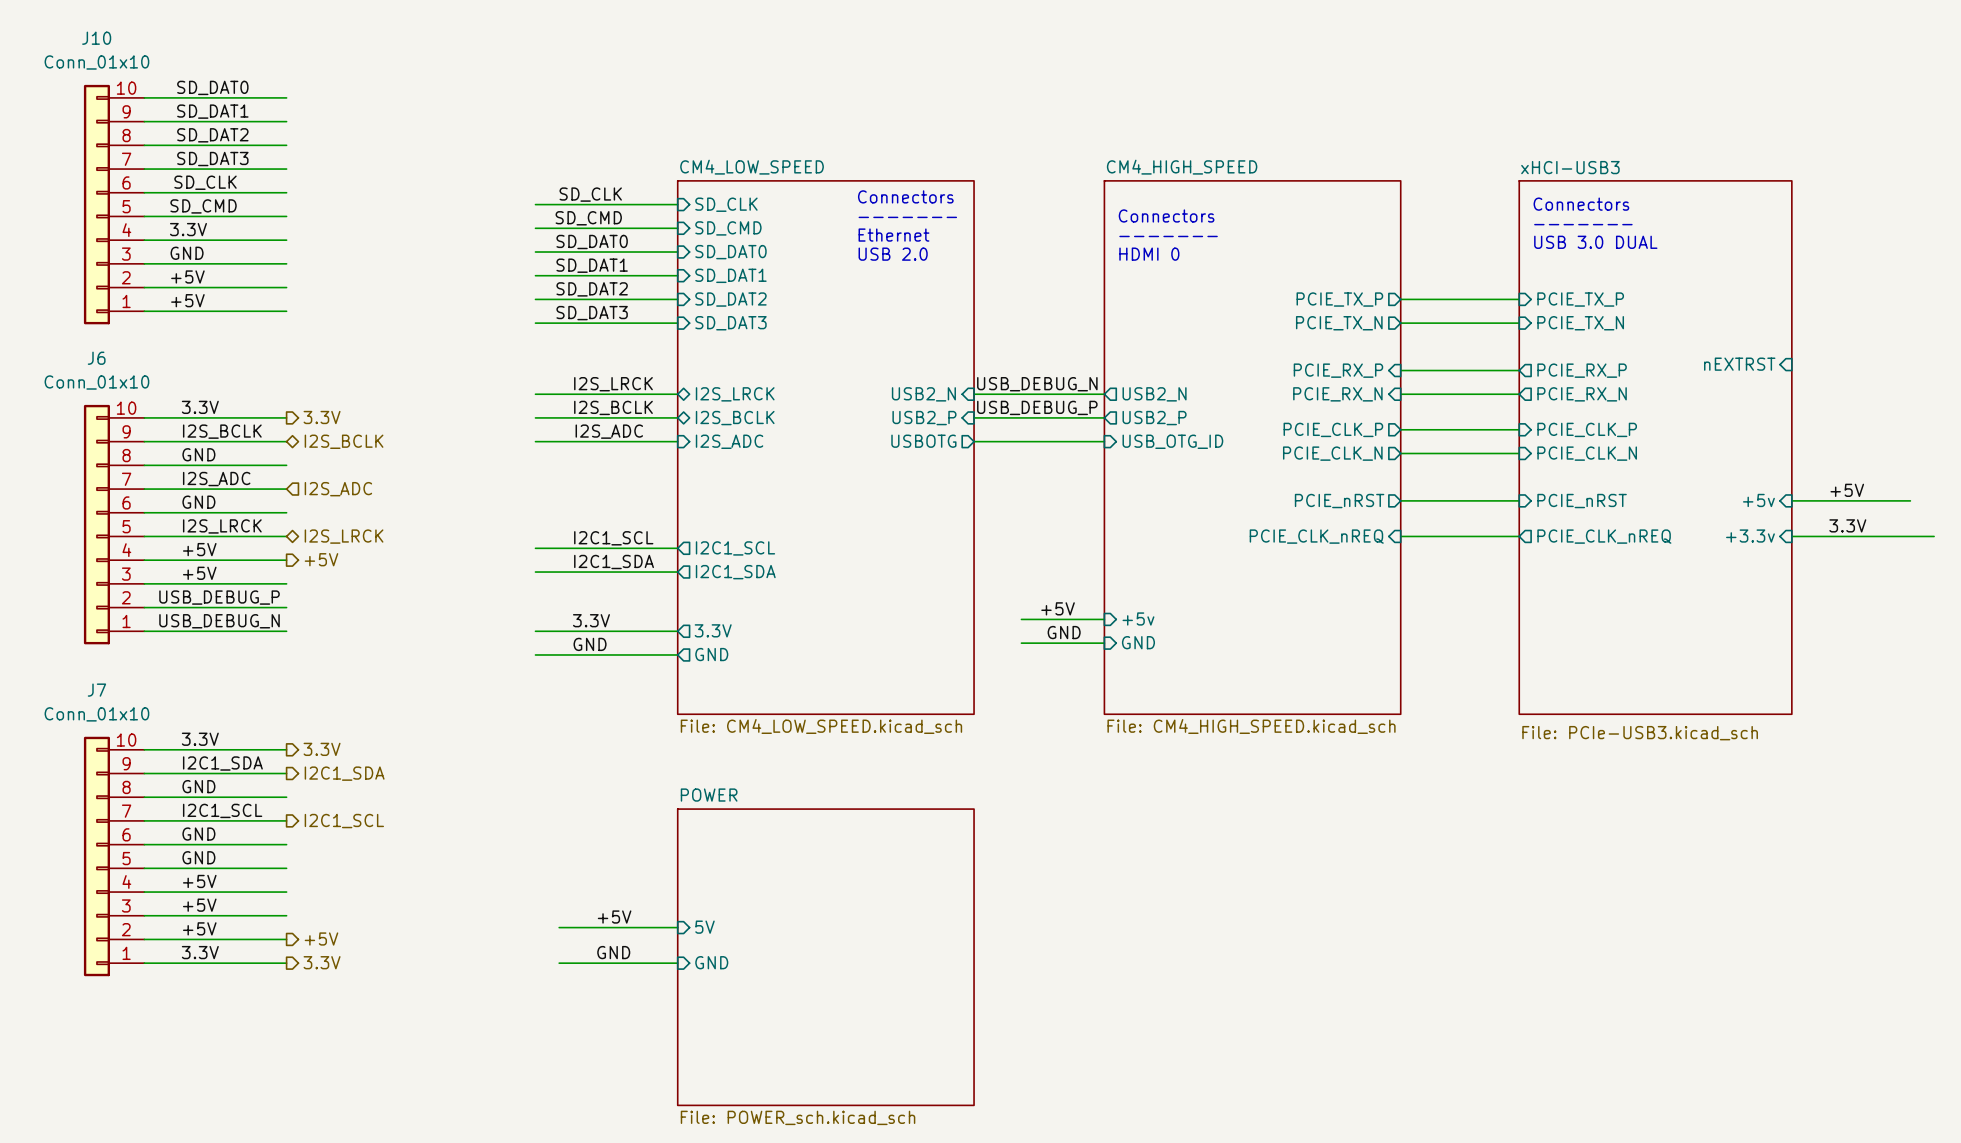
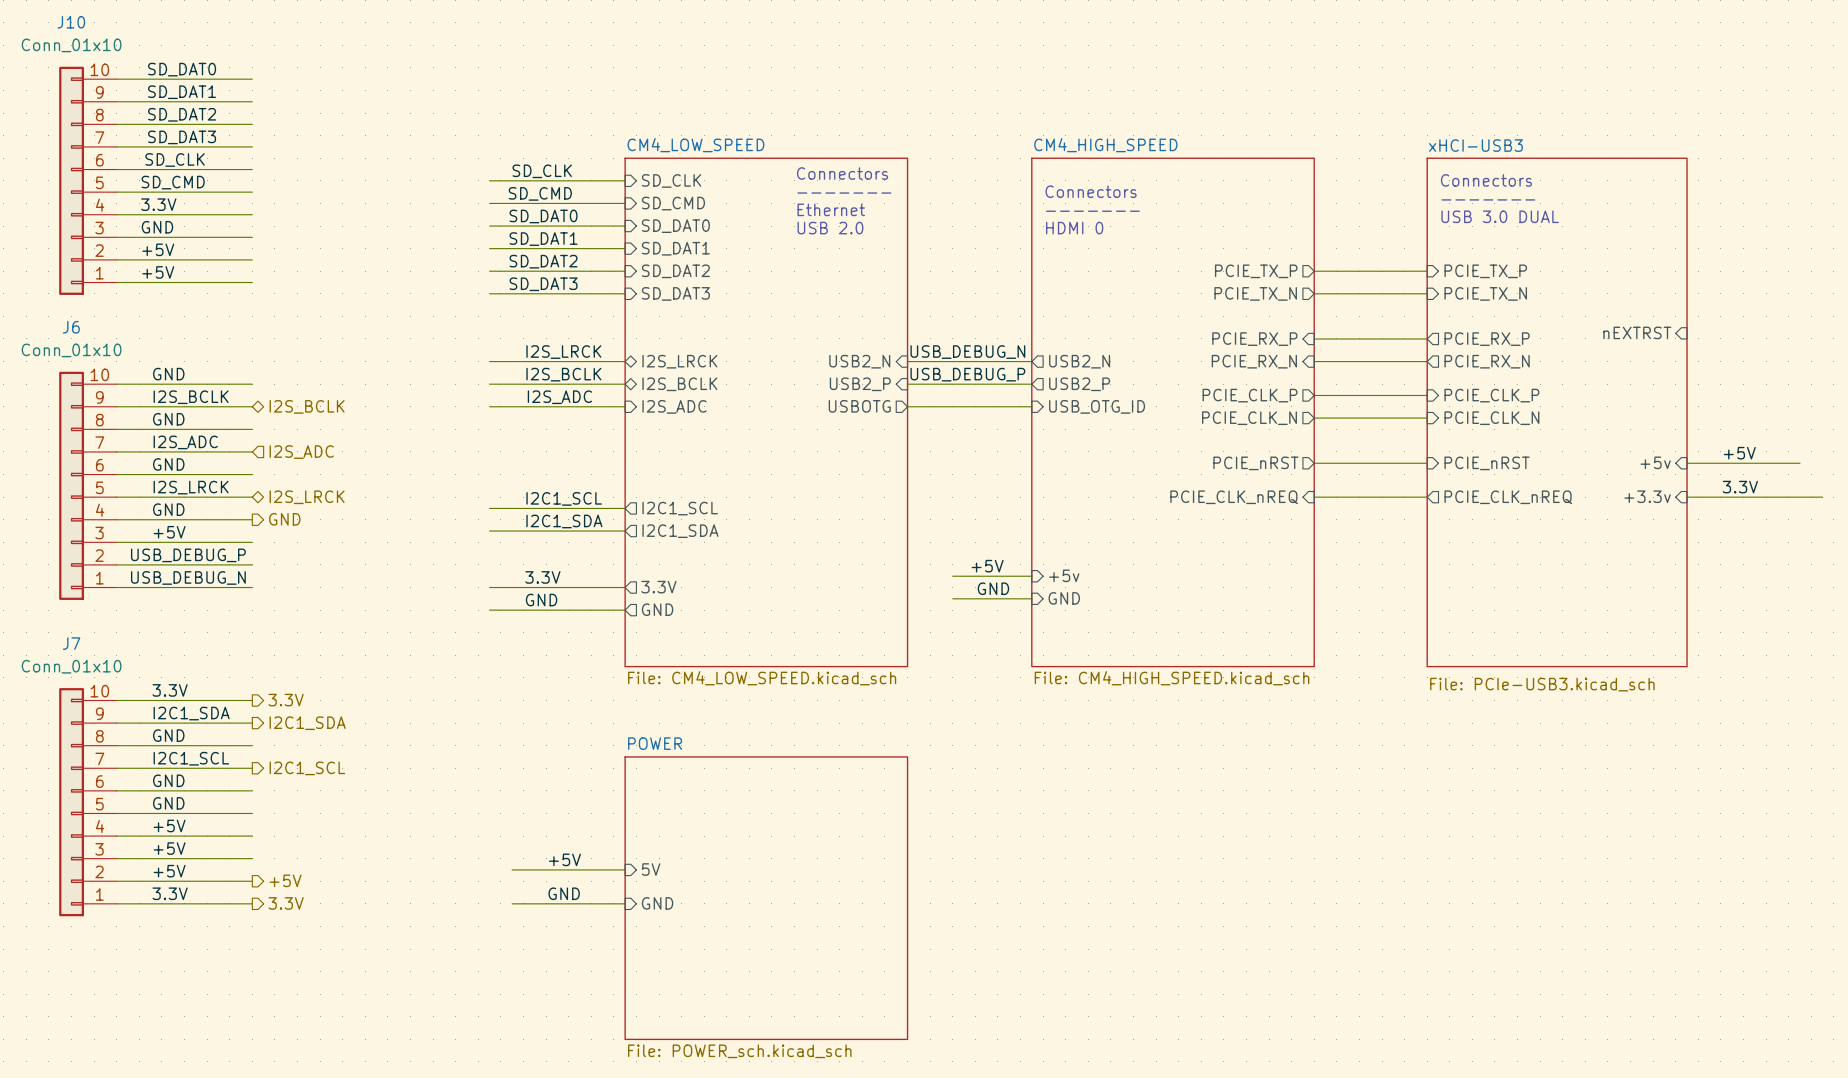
label: 3.3V (200, 407) -> GND (168, 374)
hierarchical label: 3.3V (322, 417) -> none
label: +5V (199, 549) -> GND (168, 509)
hierarchical label: +5V (321, 559) -> GND (284, 519)

